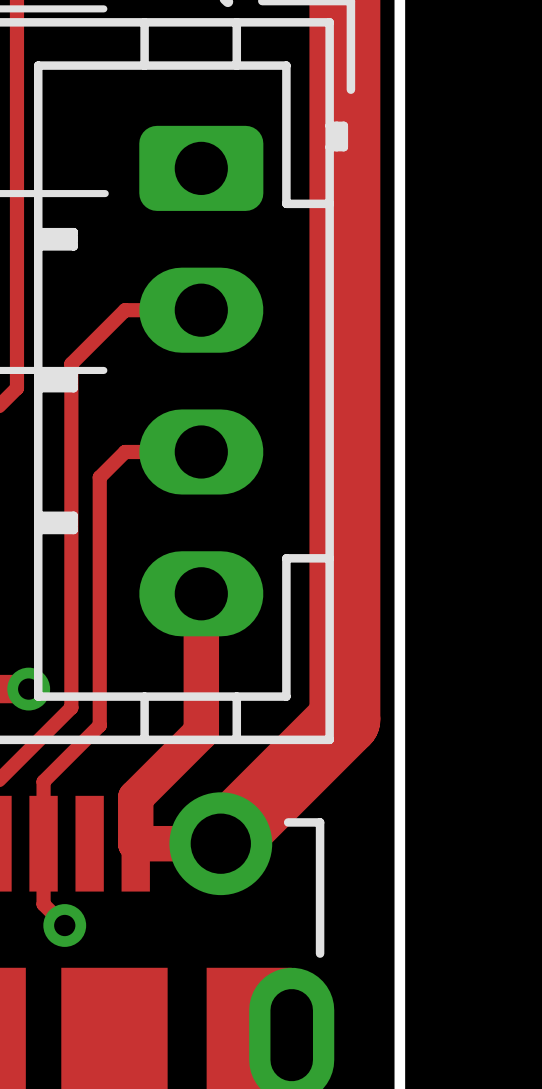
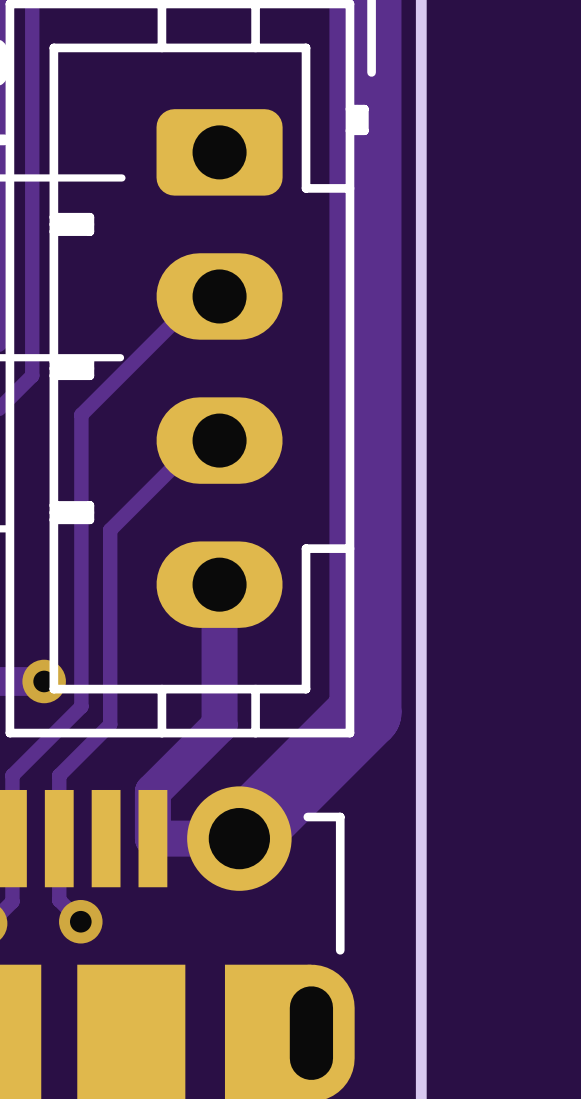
track: (181, 310) (125, 310) (71, 363) (71, 707) (65, 713) -> (199, 296) (81, 414) (81, 706)
track: (181, 451) (125, 451) (99, 477) (99, 725) (93, 731) -> (199, 440) (110, 530) (110, 724)

